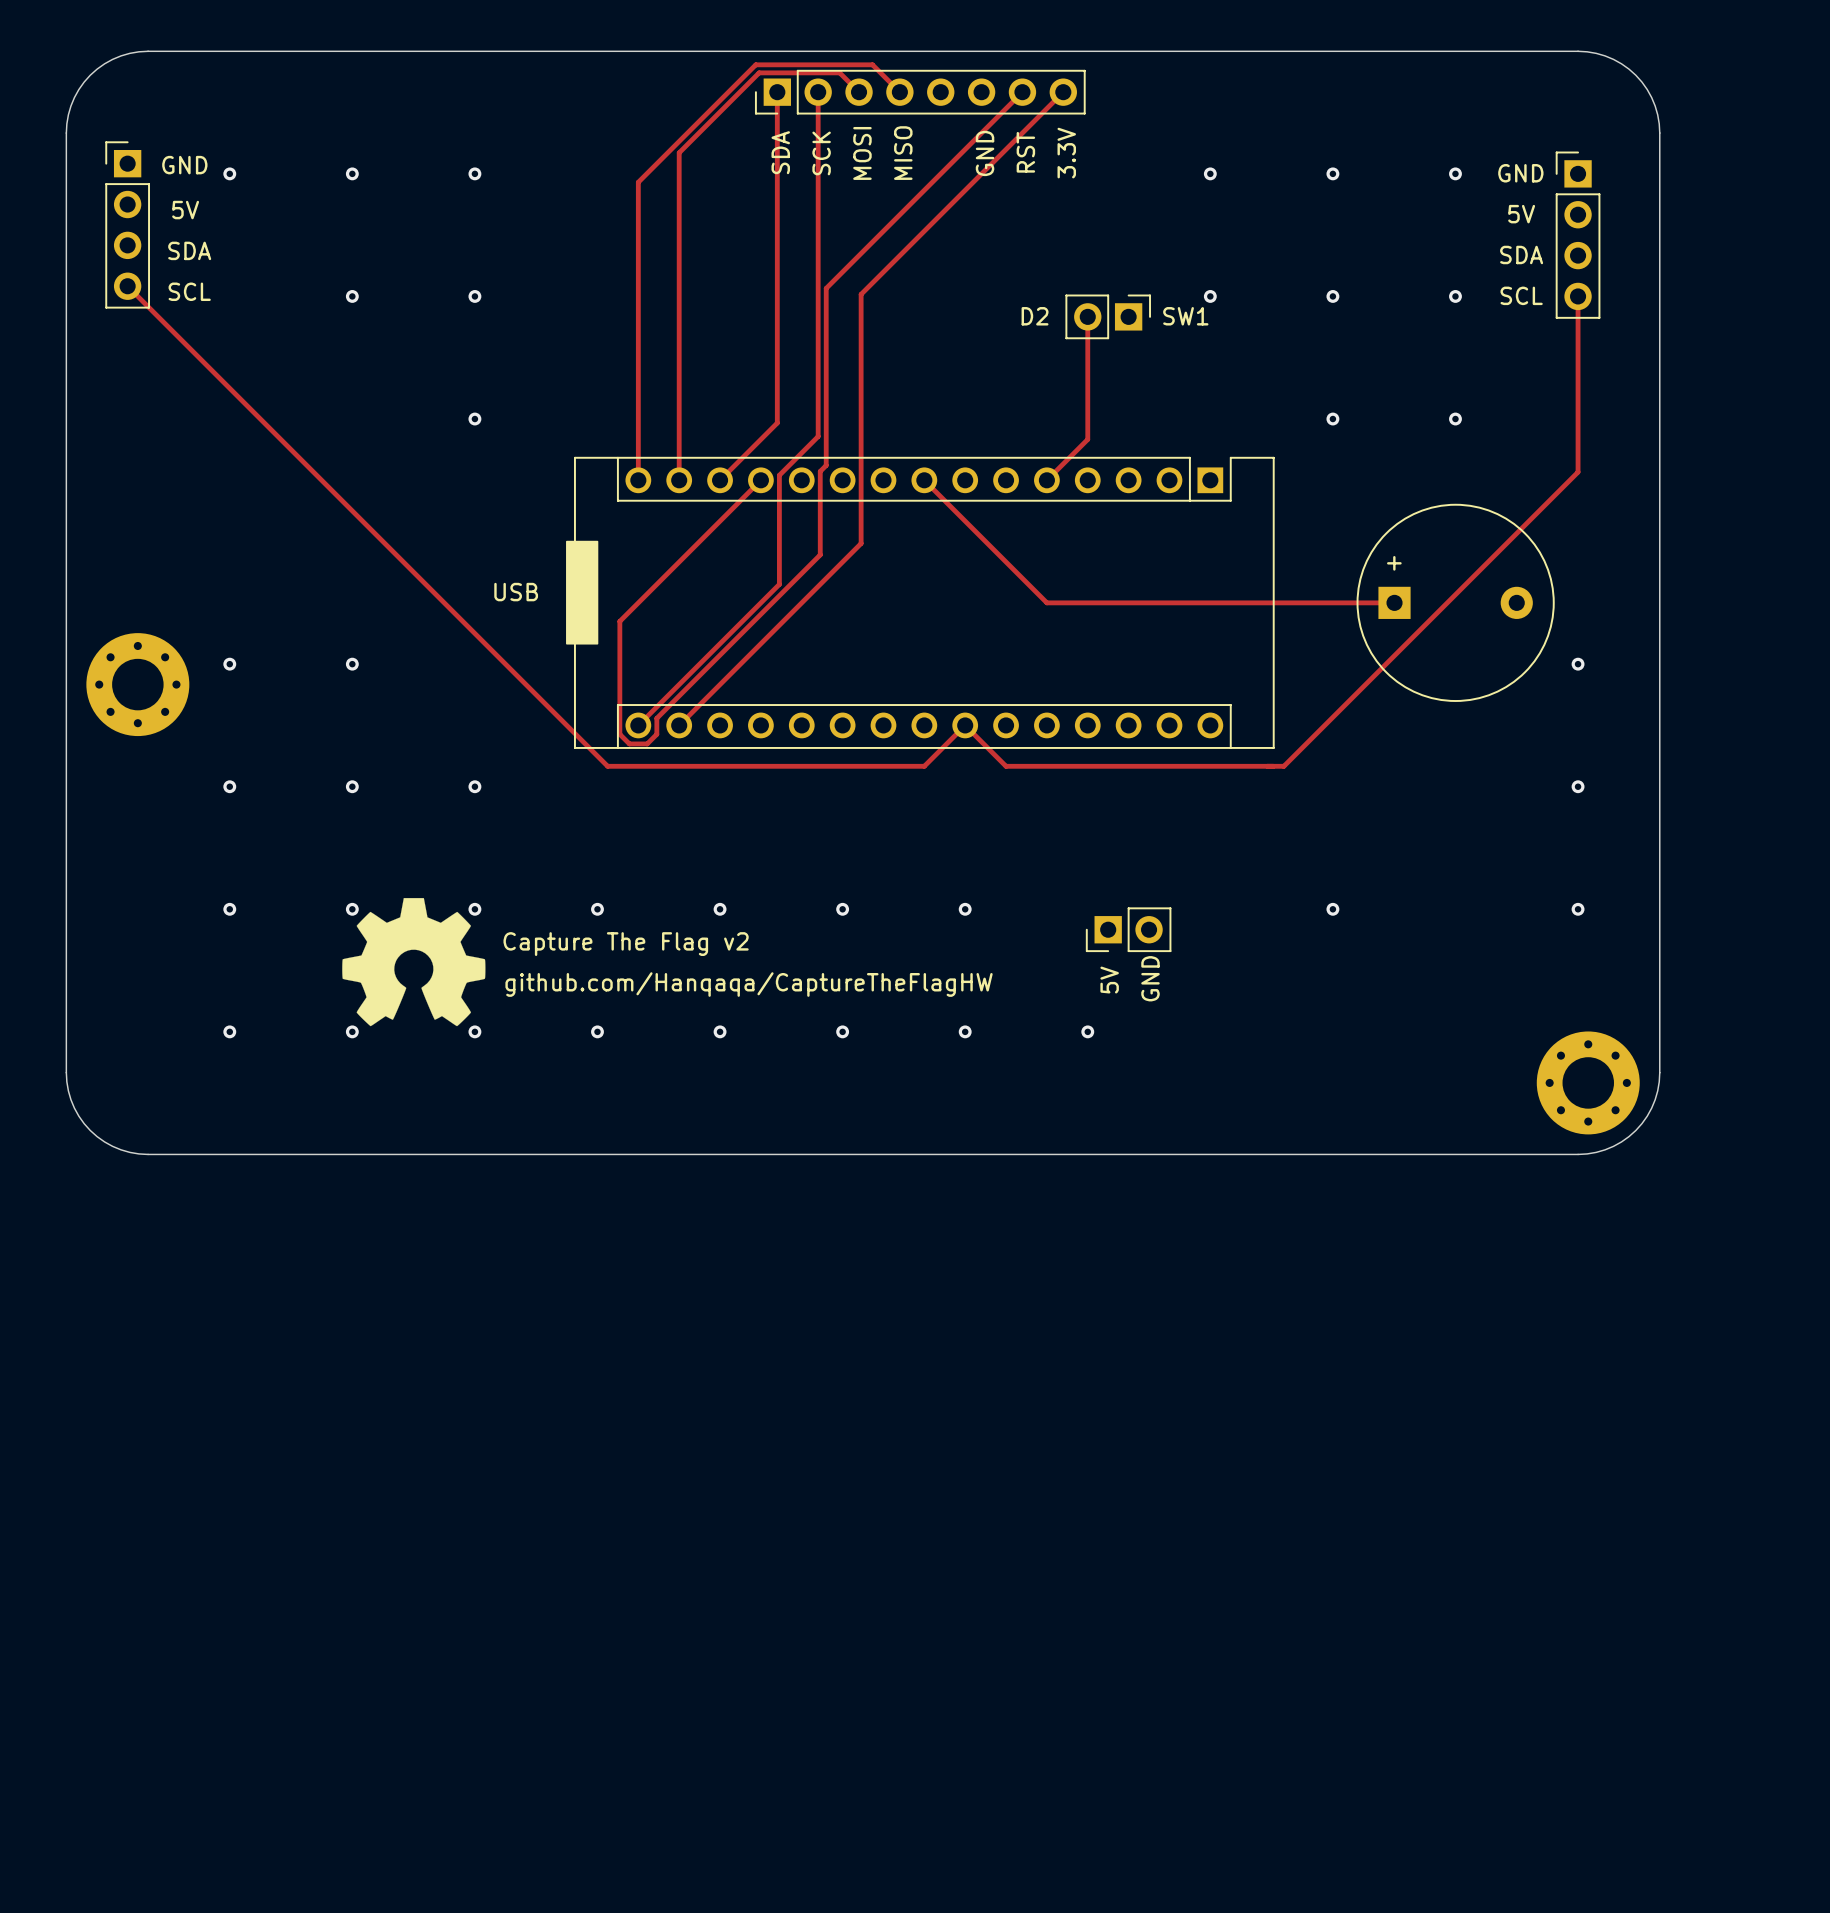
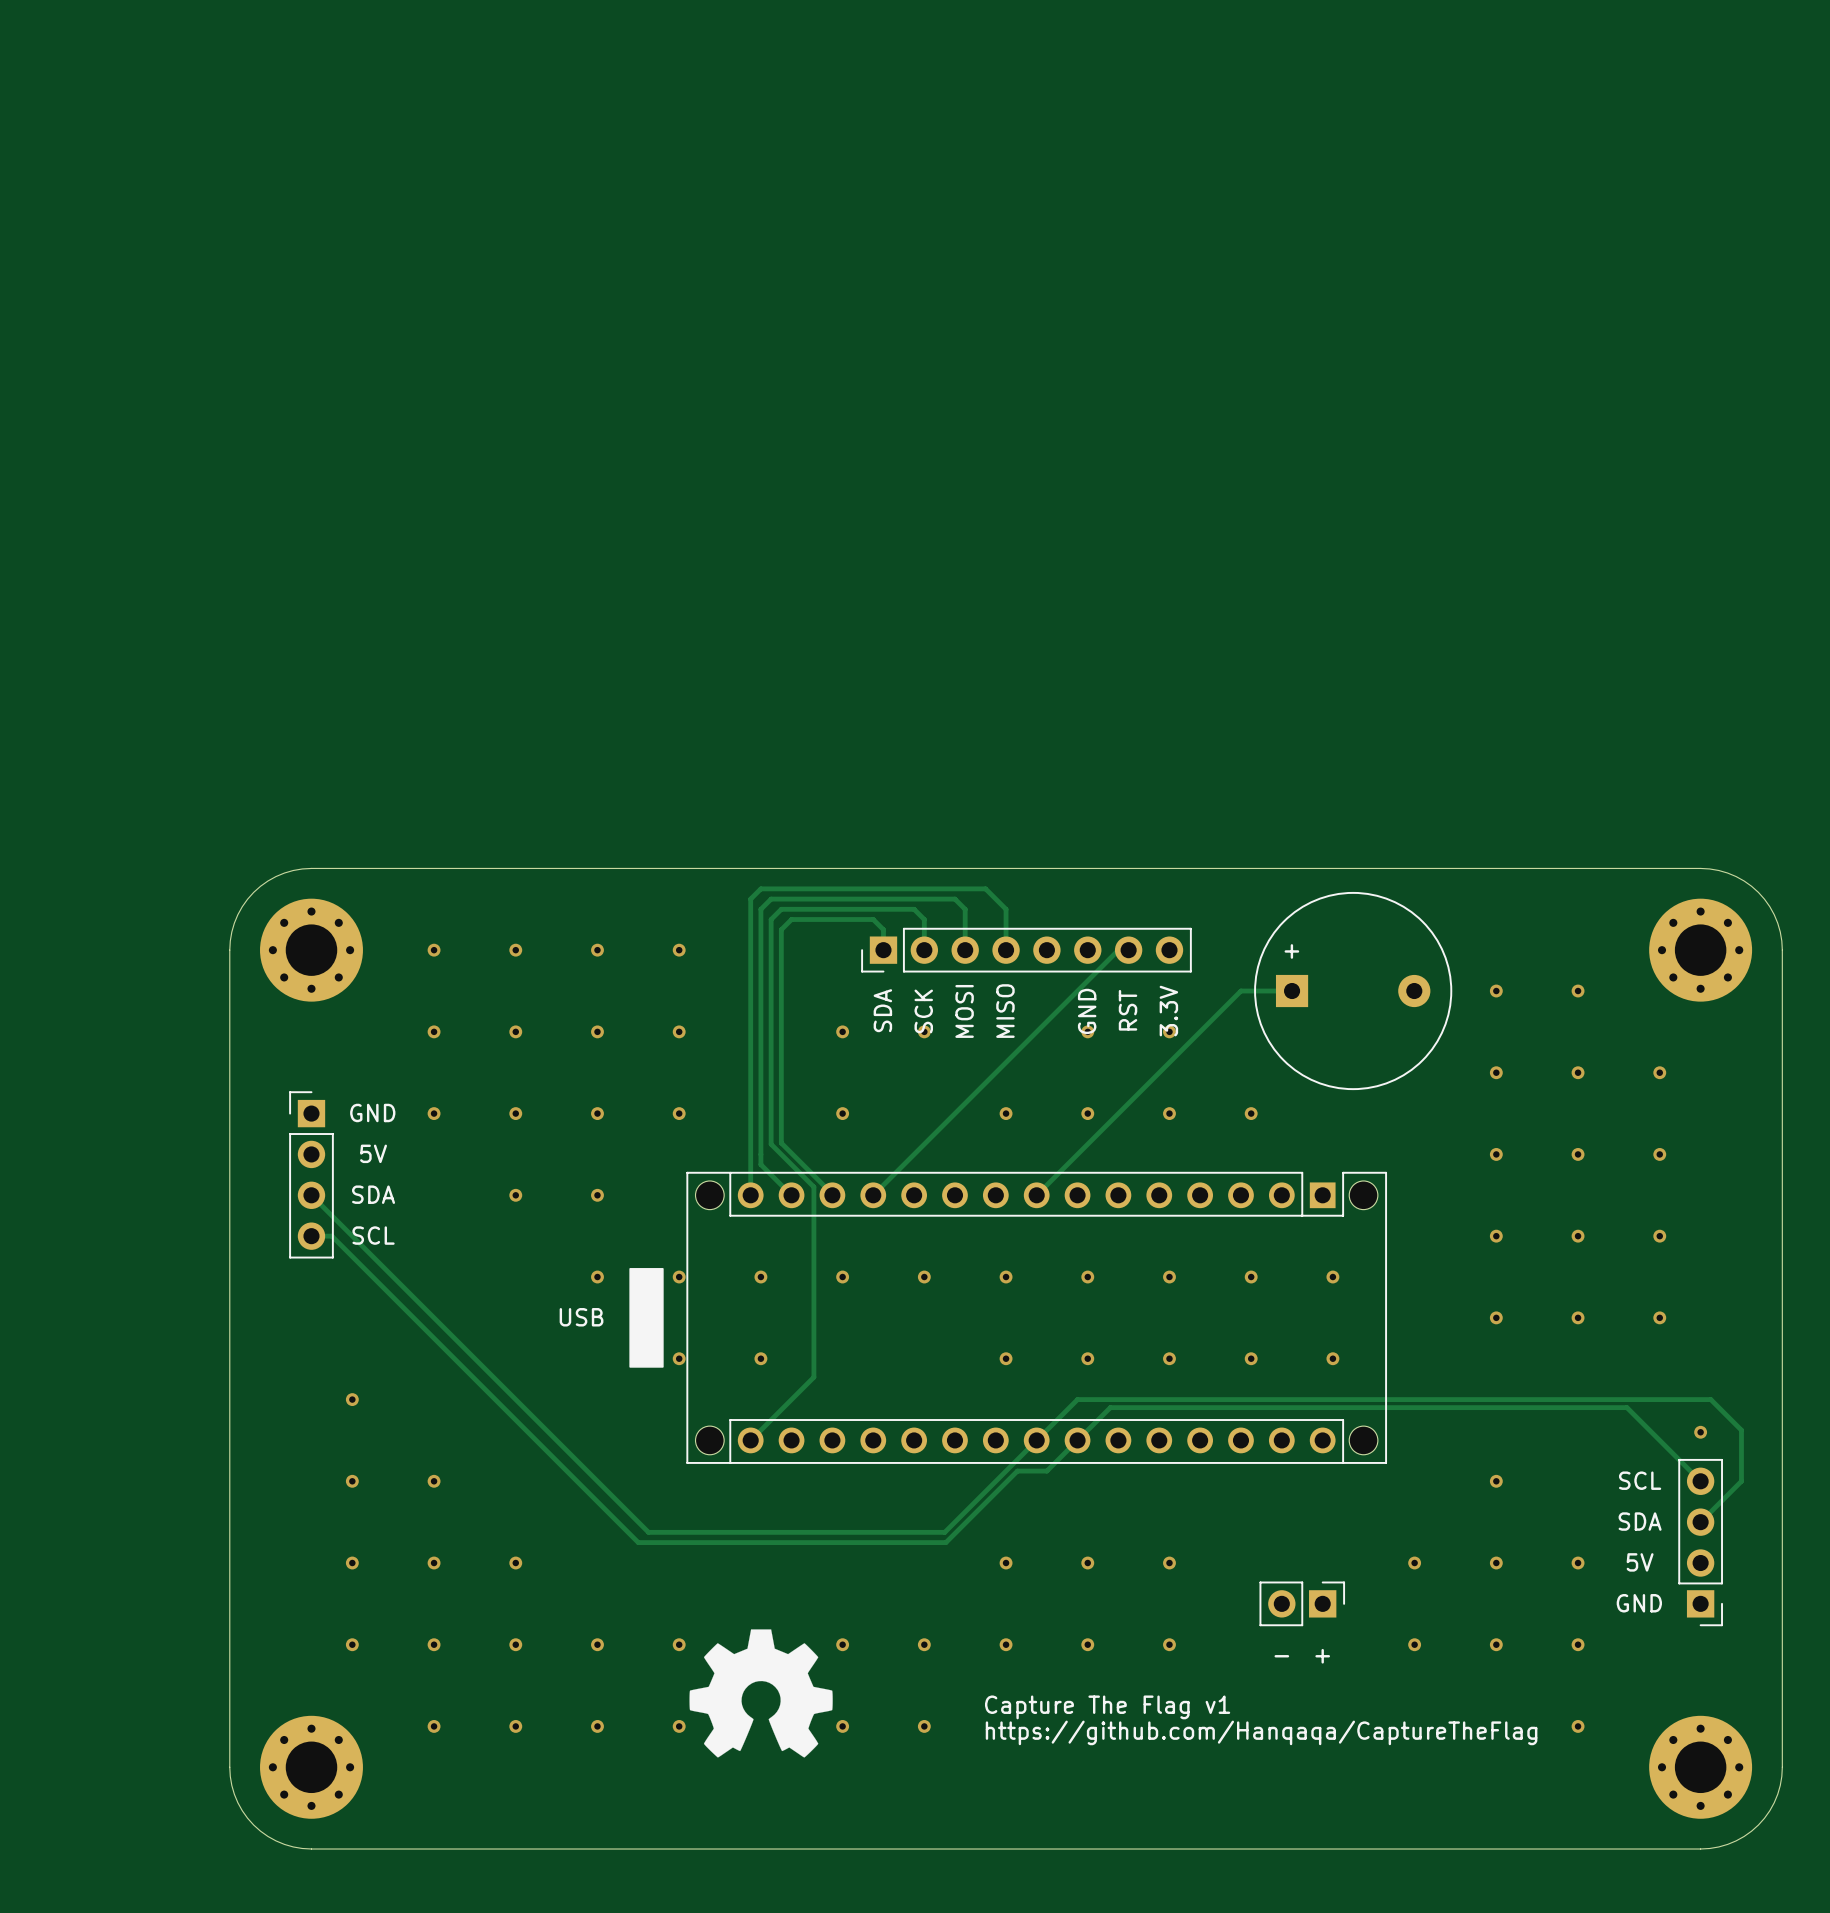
board edge: (148, 51) (1578, 51) (1605, 55) (1629, 69) (1641, 82) (1651, 97) (1657, 114) (1659, 133) (1659, 1072) (1655, 1099) (1641, 1123) (1629, 1136) (1613, 1146) (1596, 1152) (1578, 1154) (148, 1154) (121, 1149) (97, 1136) (84, 1123) (74, 1108) (68, 1090) (66, 1072) (66, 133) (68, 114) (74, 97) (90, 75) (112, 59) (129, 53) (148, 51) -> none
track: (777, 92) (777, 423) (720, 480) -> none
track: (818, 92) (818, 436) (779, 475) (779, 584) (638, 725) -> none
track: (859, 92) (839, 72) (759, 72) (679, 152) (679, 480) -> none
track: (899, 92) (872, 64) (755, 64) (638, 182) (638, 480) -> none
part: (920, 92) -> none
track: (1022, 92) (826, 288) (826, 465) (820, 471) (820, 554) (656, 718) (656, 734) (647, 743) (629, 743) (619, 734) (619, 621) (760, 480) -> none
track: (1063, 92) (861, 294) (861, 543) (679, 725) -> none
text: SDA (780, 152) -> none
text: RST (1025, 152) -> none
text: SCK (821, 153) -> none
text: MOSI (862, 153) -> none
text: MISO (903, 153) -> none
text: GND (985, 153) -> none
text: 3.3V (1066, 153) -> none
text: GND (184, 165) -> none
via: (229, 173) -> none
via: (352, 173) -> none
via: (474, 173) -> none
via: (1210, 173) -> none
via: (1332, 173) -> none
via: (1455, 173) -> none
text: GND (1520, 173) -> none
text: 5V (185, 210) -> none
text: 5V (1521, 214) -> none
part: (127, 224) -> none
part: (1578, 235) -> none
text: SDA (189, 250) -> none
text: SDA (1521, 254) -> none
track: (127, 286) (607, 766) (924, 766) (965, 725) (1006, 766) (1283, 766) (1578, 472) (1578, 296) -> none
text: SCL (189, 291) -> none
text: SCL (1521, 295) -> none
via: (352, 296) -> none
via: (474, 296) -> none
via: (1210, 296) -> none
via: (1332, 296) -> none
via: (1455, 296) -> none
text: D2 (1035, 316) -> none
track: (1087, 316) (1087, 439) (1046, 480) -> none
SW1: (1108, 316) -> none
via: (474, 419) -> none
via: (1332, 419) -> none
via: (1455, 419) -> none
track: (924, 480) (1046, 602) (1394, 602) -> none
drawing: [566, 540, 599, 645] -> none
text: USB (516, 592) -> none
part: (924, 602) -> none
part position: (1455, 602) -> (1353, 991)
via: (229, 664) -> none
via: (352, 664) -> none
via: (1578, 664) -> none
part position: (137, 684) -> (311, 950)
via: (229, 786) -> none
via: (352, 786) -> none
via: (474, 786) -> none
via: (1578, 786) -> none
board edge: none -> (311, 868) (1700, 868) (1727, 873) (1744, 880) (1758, 892) (1769, 906) (1780, 931) (1782, 950) (1782, 1767) (1780, 1785) (1769, 1810) (1758, 1825) (1744, 1836) (1718, 1846) (1700, 1849) (311, 1849) (284, 1844) (268, 1836) (253, 1825) (237, 1802) (231, 1785) (229, 1767) (229, 950) (234, 923) (242, 906) (253, 892) (268, 880) (284, 873) (311, 868)
drawing: [342, 898, 486, 1027] -> none
via: (229, 909) -> none
via: (352, 909) -> none
via: (474, 909) -> none
via position: (597, 909) -> (597, 950)
via: (720, 909) -> none
via: (842, 909) -> none
via: (965, 909) -> none
via: (1332, 909) -> none
via: (1578, 909) -> none
part: (1128, 929) -> none
text: Capture The Flag v2 (626, 944) -> none
via: none -> (434, 950)
via: none -> (515, 950)
via: none -> (679, 950)
track: none -> (883, 950) (883, 929) (873, 919) (791, 919) (781, 929) (781, 1143) (832, 1195)
track: none -> (924, 950) (924, 919) (914, 909) (781, 909) (771, 919) (771, 1144) (813, 1187) (813, 1377) (750, 1440)
track: none -> (965, 950) (965, 909) (954, 899) (771, 899) (760, 909) (760, 1164) (791, 1195)
track: none -> (1006, 950) (1006, 909) (985, 888) (760, 888) (750, 899) (750, 1195) (760, 1195)
part: none -> (1026, 950)
track: none -> (1128, 950) (1118, 950) (873, 1195) (883, 1195)
text position: GND (1150, 978) -> GND (1087, 1011)
text: 5V (1109, 980) -> none
text: github.com/Hanqaqa/CaptureTheFlagHW (749, 984) -> none
track: none -> (1292, 991) (1240, 991) (1036, 1195)
via: none -> (1496, 991)
via: none -> (1578, 991)
text: none -> SDA (882, 1010)
text: none -> RST (1128, 1010)
text: none -> SCK (923, 1011)
text: none -> MOSI (964, 1011)
text: none -> MISO (1005, 1011)
text: none -> 3.3V (1168, 1011)
via: (229, 1031) -> none
via: (352, 1031) -> none
via: none -> (434, 1031)
via: (474, 1031) -> none
via: none -> (515, 1031)
via position: (720, 1031) -> (679, 1031)
via position: (965, 1031) -> (924, 1031)
via: none -> (1169, 1031)
via: none -> (1496, 1072)
via: none -> (1578, 1072)
via: none -> (1659, 1072)
part position: (1588, 1082) -> (1700, 950)
text: none -> GND (372, 1112)
via: none -> (434, 1113)
via: none -> (515, 1113)
via: none -> (597, 1113)
via: none -> (679, 1113)
via: none -> (842, 1113)
via: none -> (1006, 1113)
via: none -> (1087, 1113)
via: none -> (1169, 1113)
via: none -> (1251, 1113)
text: none -> 5V (373, 1153)
via: none -> (1496, 1154)
via: none -> (1578, 1154)
via: none -> (1659, 1154)
part: none -> (311, 1174)
text: none -> SDA (373, 1194)
track: none -> (311, 1195) (648, 1532) (944, 1532) (1077, 1399) (1710, 1399) (1741, 1430) (1741, 1481) (1700, 1522)
via: none -> (515, 1195)
via: none -> (597, 1195)
text: none -> SCL (373, 1235)
track: none -> (311, 1236) (331, 1236) (638, 1542) (945, 1542) (1017, 1471) (1046, 1471) (1110, 1407) (1626, 1407) (1700, 1481)
via: none -> (1496, 1236)
via: none -> (1578, 1236)
via: none -> (1659, 1236)
drawing: none -> [629, 1268, 664, 1368]
via: none -> (597, 1277)
via: none -> (679, 1277)
via: none -> (760, 1277)
via: none -> (842, 1277)
via: none -> (924, 1277)
via: none -> (1006, 1277)
via: none -> (1087, 1277)
via: none -> (1169, 1277)
via: none -> (1251, 1277)
via: none -> (1332, 1277)
text: none -> USB (581, 1317)
part: none -> (1036, 1317)
via: none -> (1496, 1317)
via: none -> (1578, 1317)
via: none -> (1659, 1317)
via: none -> (679, 1358)
via: none -> (760, 1358)
via: none -> (1006, 1358)
via: none -> (1087, 1358)
via: none -> (1169, 1358)
via: none -> (1251, 1358)
via: none -> (1332, 1358)
via: none -> (352, 1399)
via: none -> (1700, 1432)
text: none -> SCL (1640, 1480)
via: none -> (352, 1481)
via: none -> (434, 1481)
via: none -> (1496, 1481)
text: none -> SDA (1640, 1521)
part: none -> (1700, 1542)
text: none -> 5V (1640, 1562)
via: none -> (352, 1563)
via: none -> (434, 1563)
via: none -> (515, 1563)
via: none -> (1006, 1563)
via: none -> (1087, 1563)
via: none -> (1169, 1563)
via: none -> (1414, 1563)
via: none -> (1496, 1563)
via: none -> (1578, 1563)
part: none -> (1302, 1603)
text: none -> GND (1639, 1603)
drawing: none -> [689, 1629, 833, 1758]
via: none -> (352, 1644)
via: none -> (434, 1644)
via: none -> (515, 1644)
via: none -> (597, 1644)
via: none -> (679, 1644)
via: none -> (842, 1644)
via: none -> (924, 1644)
via: none -> (1006, 1644)
via: none -> (1087, 1644)
via: none -> (1169, 1644)
via: none -> (1414, 1644)
via: none -> (1496, 1644)
via: none -> (1578, 1644)
text: none -> - (1281, 1656)
text: none -> + (1322, 1656)
text: none -> Capture The Flag v1 (1107, 1707)
via: none -> (434, 1726)
via: none -> (515, 1726)
via: none -> (597, 1726)
via: none -> (679, 1726)
via: none -> (842, 1726)
via: none -> (924, 1726)
via: none -> (1578, 1726)
text: none -> https://github.com/Hanqaqa/CaptureTheFlag (1261, 1732)
part: none -> (311, 1767)
part: none -> (1700, 1767)

